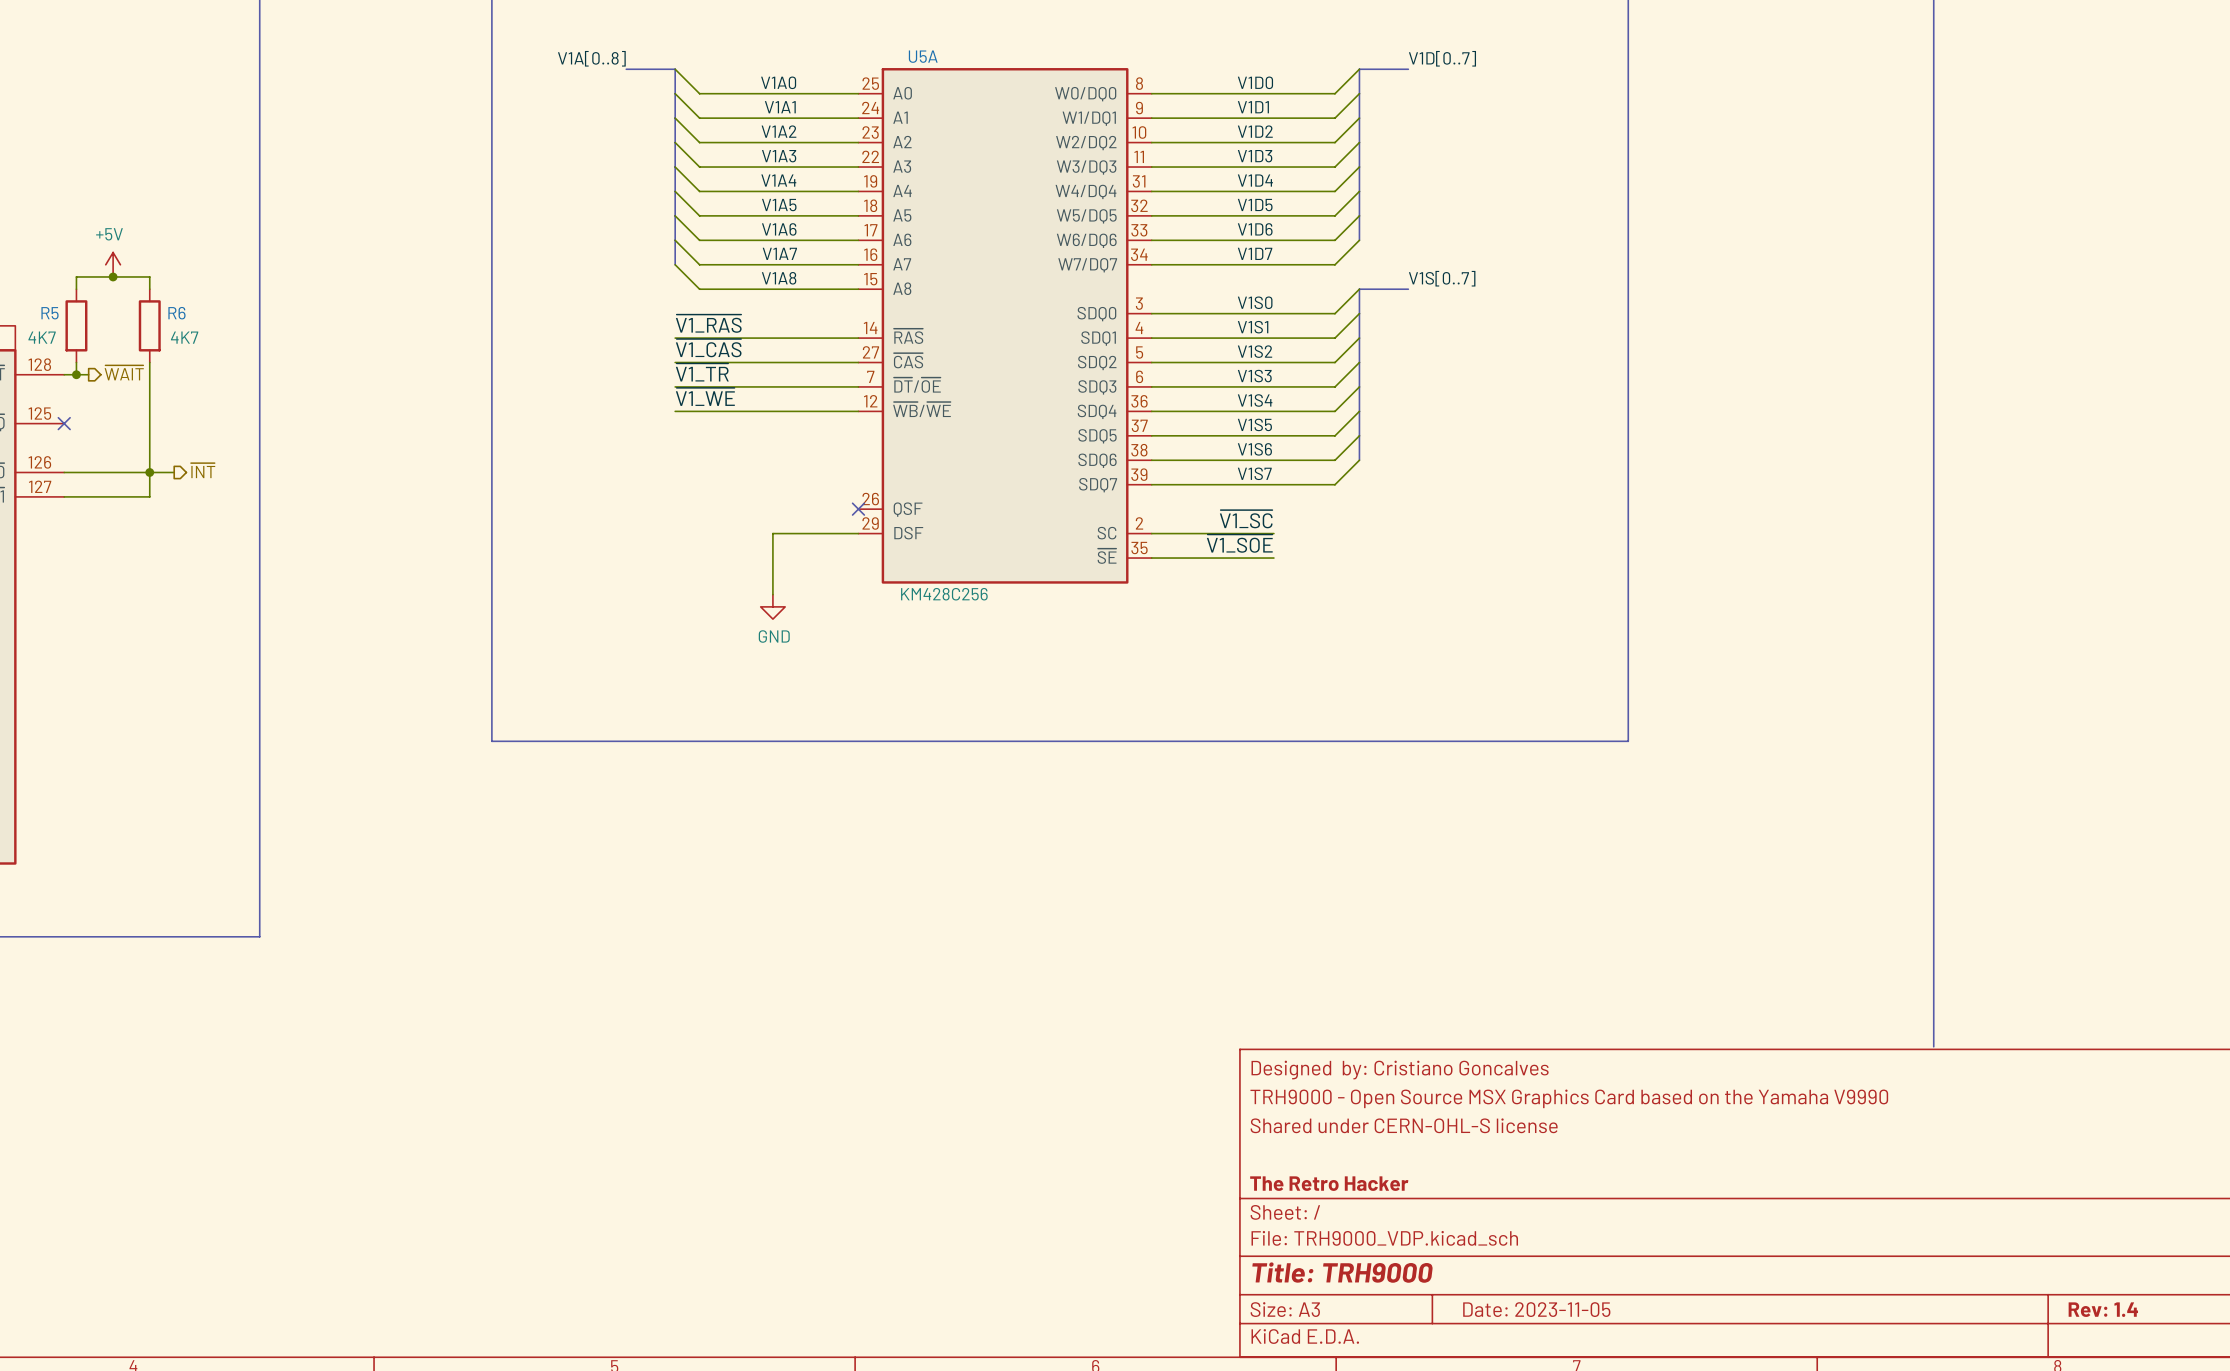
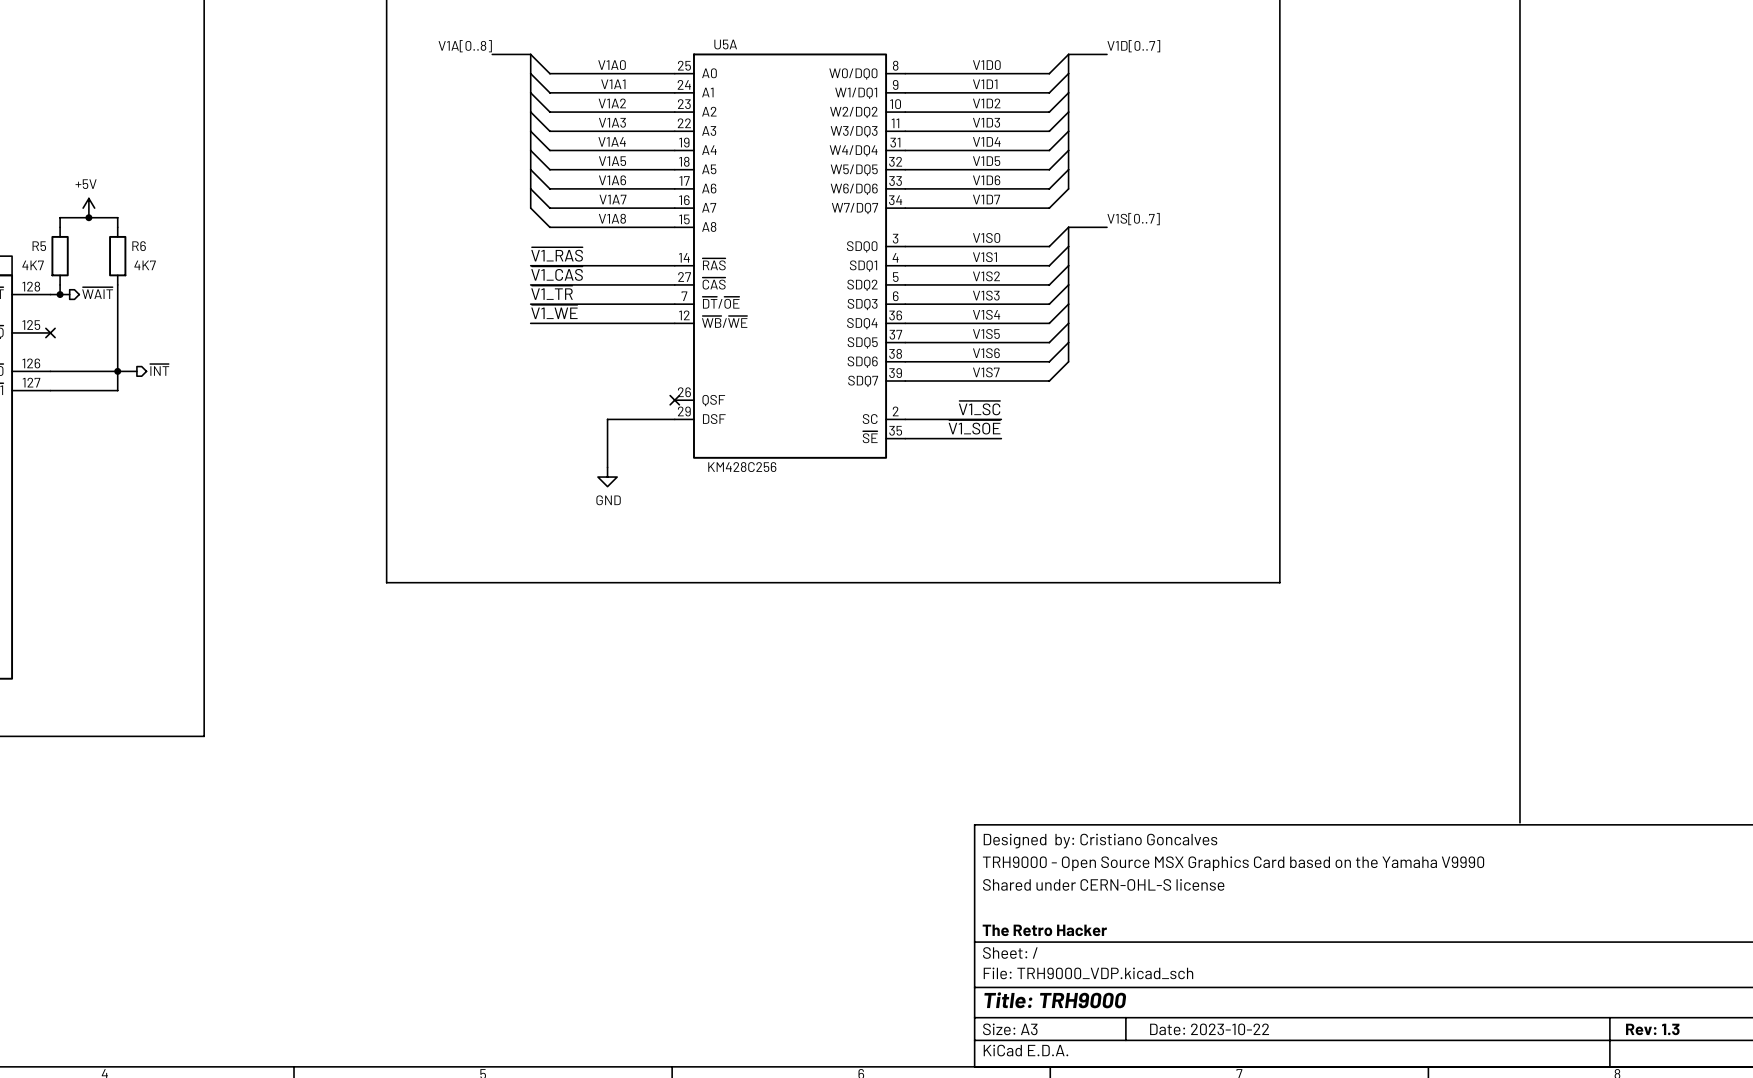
title block: Date: 2023-11-05 (1536, 1309) -> Date: 2023-10-22 (1209, 1029)
title block: Rev: 1.4 (2103, 1309) -> Rev: 1.3 (1652, 1029)

